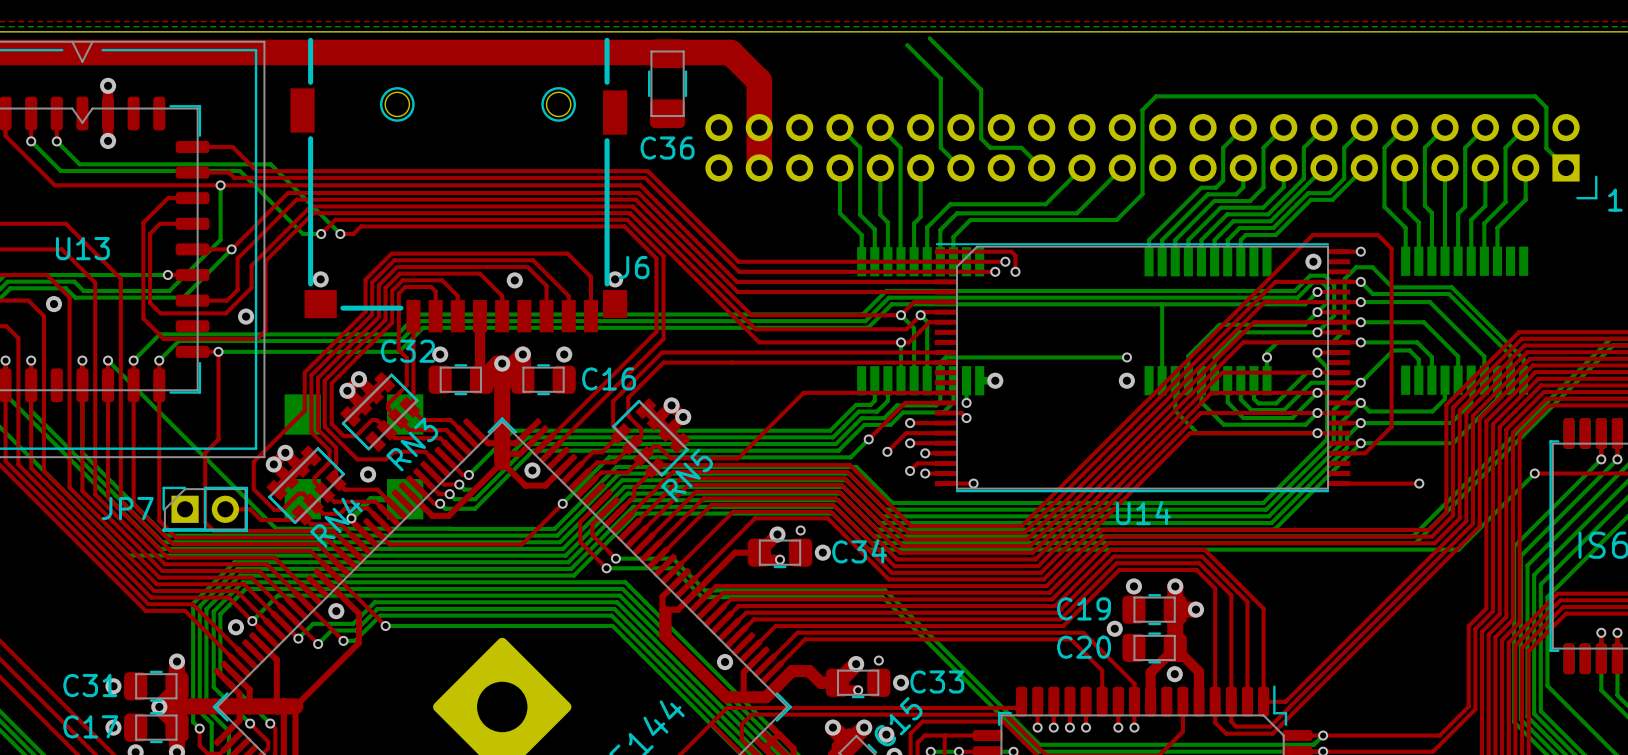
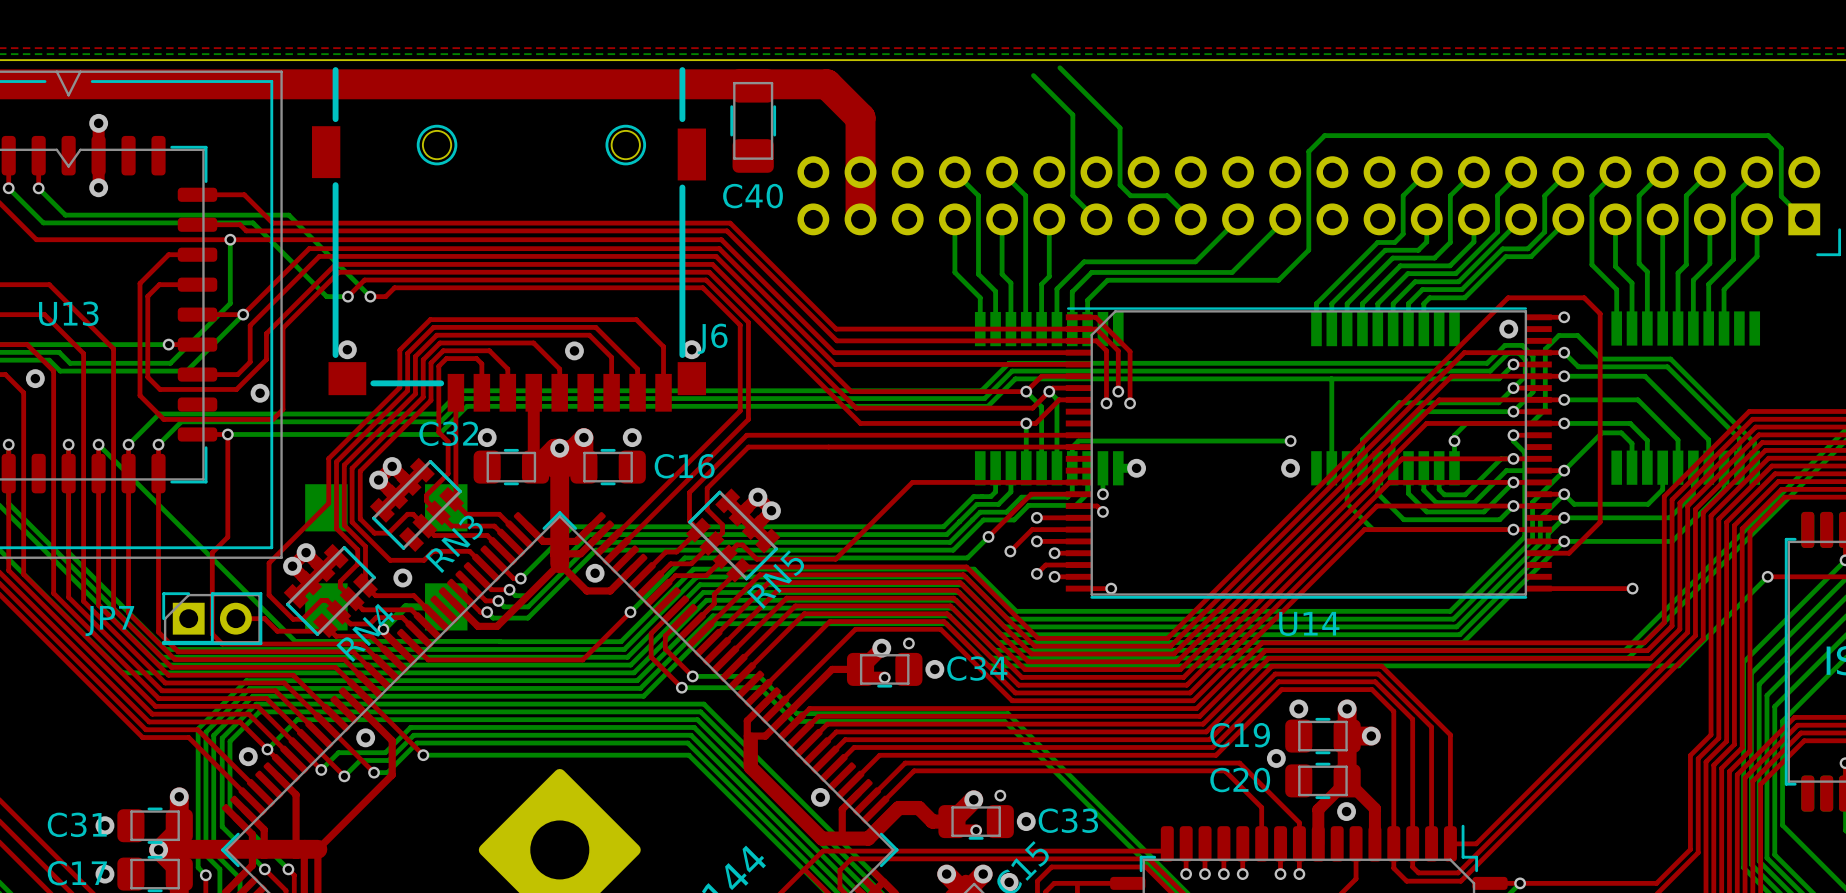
C36 name: C36 (667, 148) -> C40 (753, 196)
top track: (960, 251) (1011, 251) (1015, 255) (1015, 271) -> (1095, 317) (1130, 351) (1130, 403)
top track: (961, 261) (1005, 261) -> (1096, 329) (1118, 350) (1118, 391)
via: (1005, 261) -> none
top track: (961, 271) (995, 271) -> (1096, 340) (1106, 350) (1106, 403)
via: (995, 271) -> none
via: (1015, 271) -> none
via: none -> (1118, 391)
via: none -> (1106, 403)
via: none -> (1130, 403)

